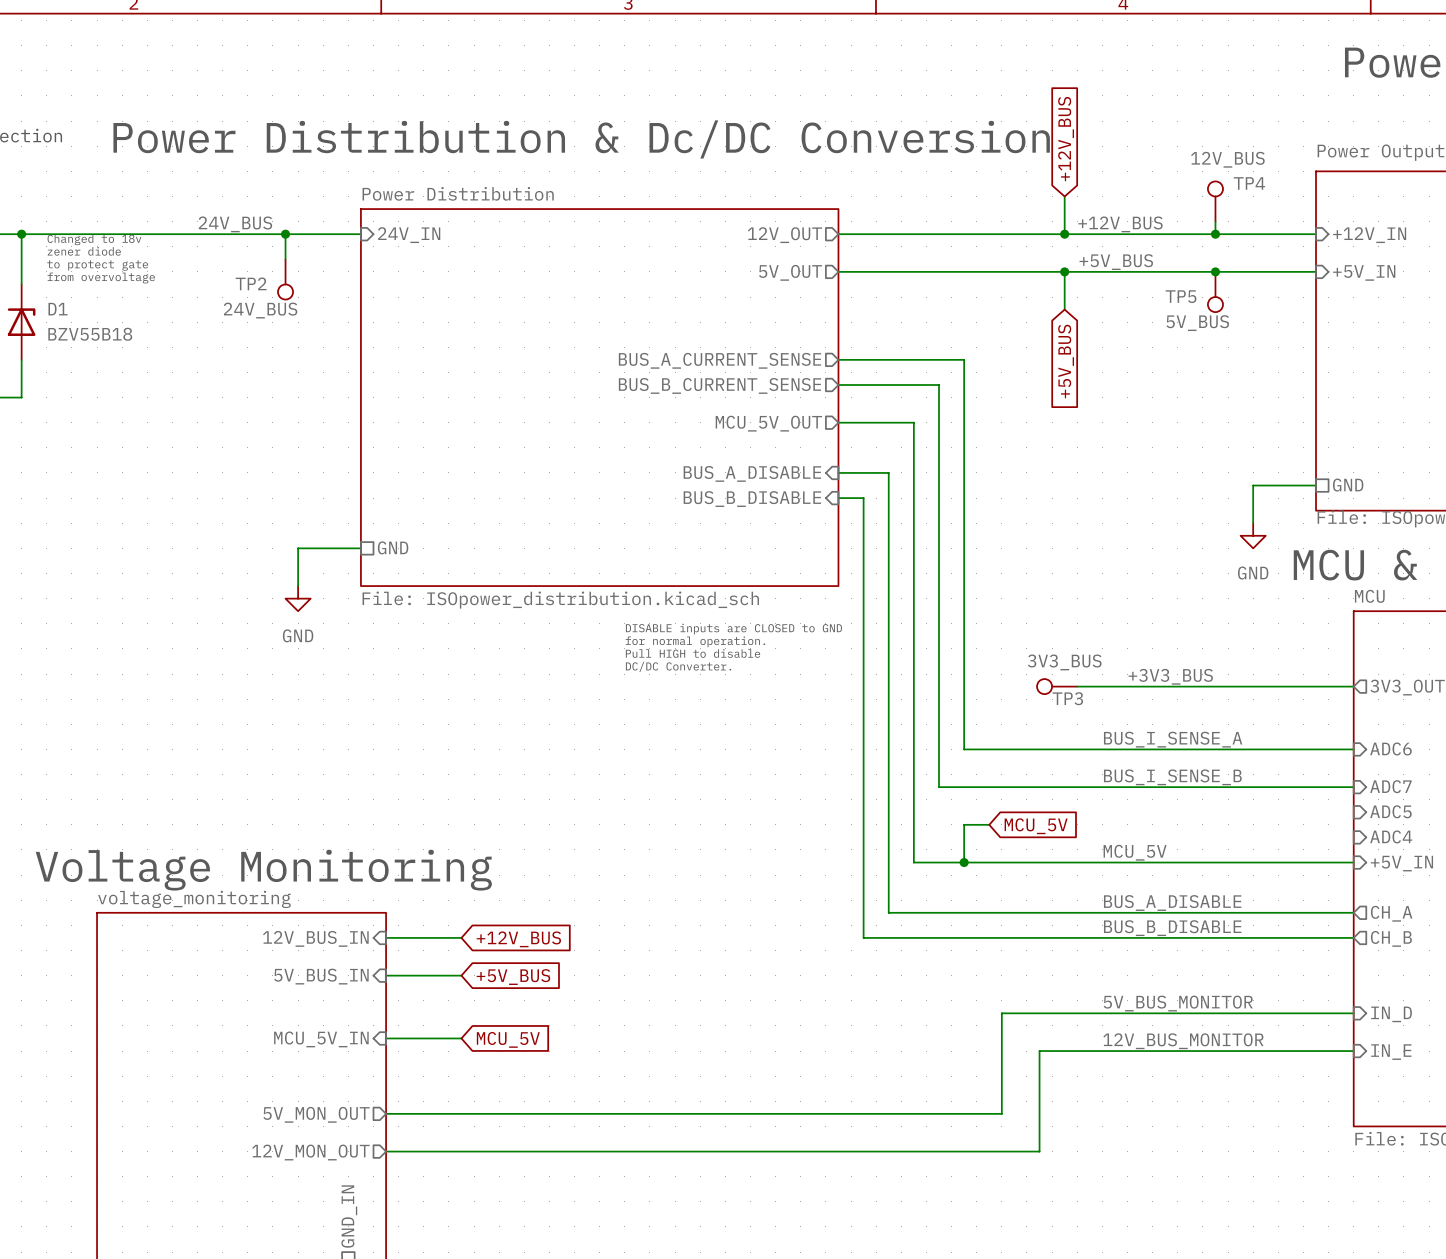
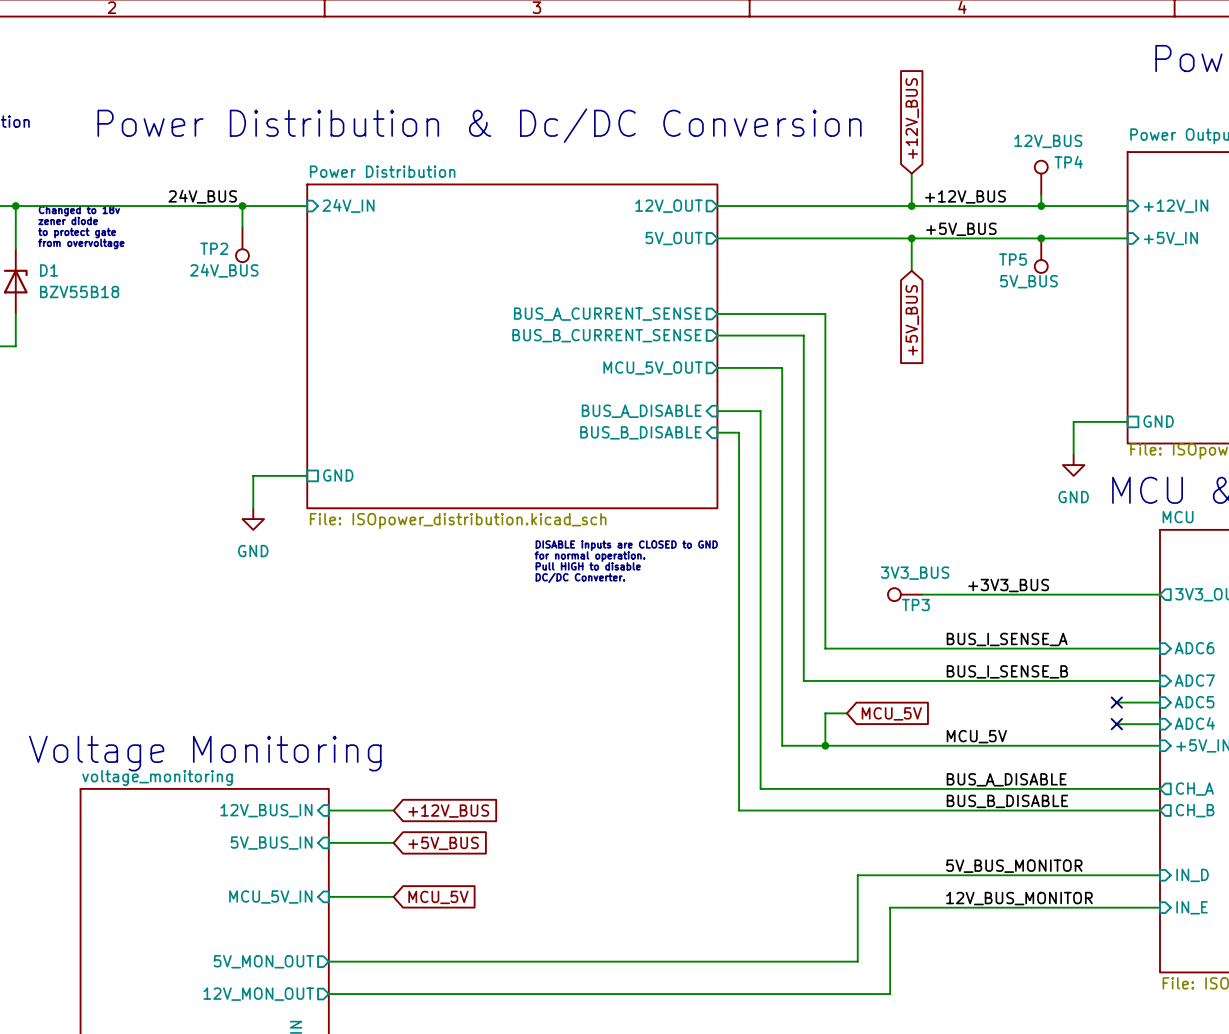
wire: none -> (1116, 702) (1159, 702)
no-connect mark: none -> (1116, 702)
wire: none -> (1116, 724) (1159, 724)
no-connect mark: none -> (1116, 724)

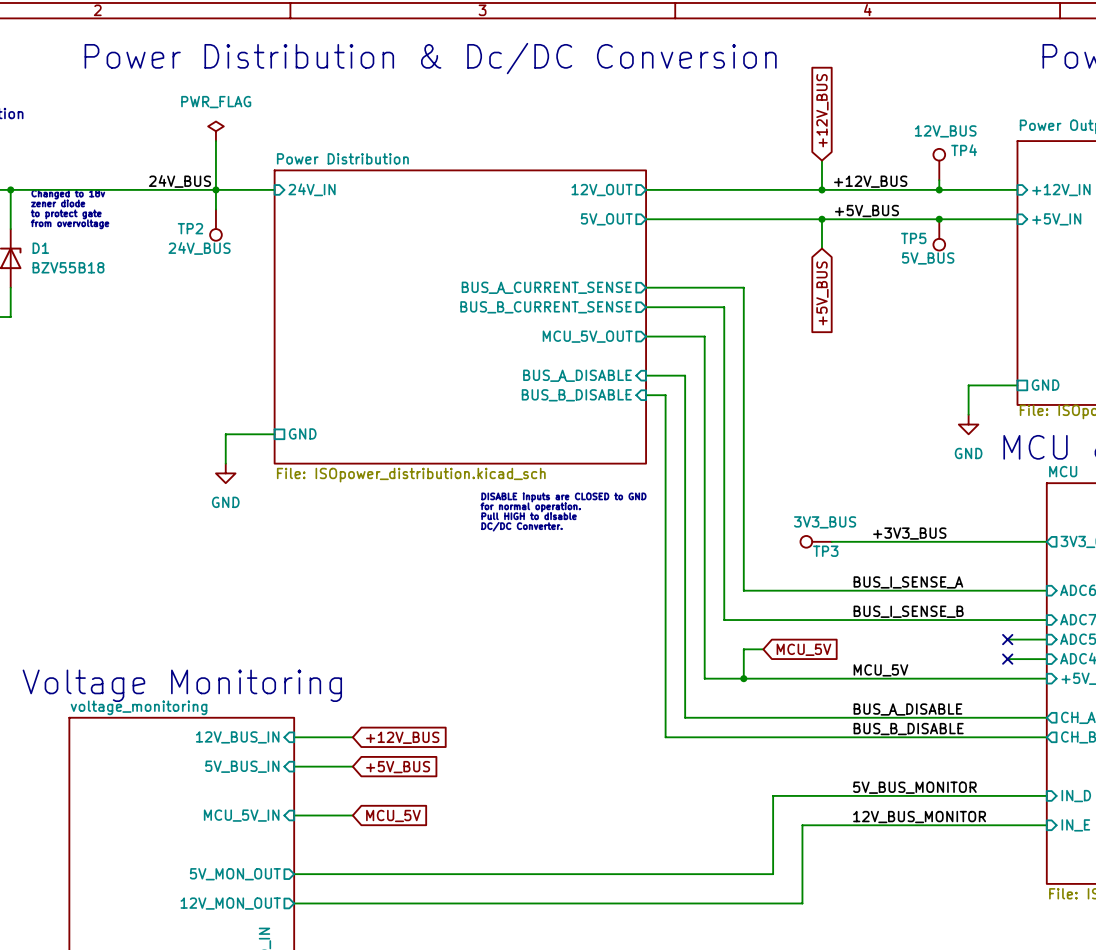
text position: Power Distribution & Dc/DC Conversion (479, 125) -> Power Distribution & Dc/DC Conversion (430, 58)
power symbol: none -> PWR_FLAG (215, 131)
wire: none -> (215, 141) (215, 189)

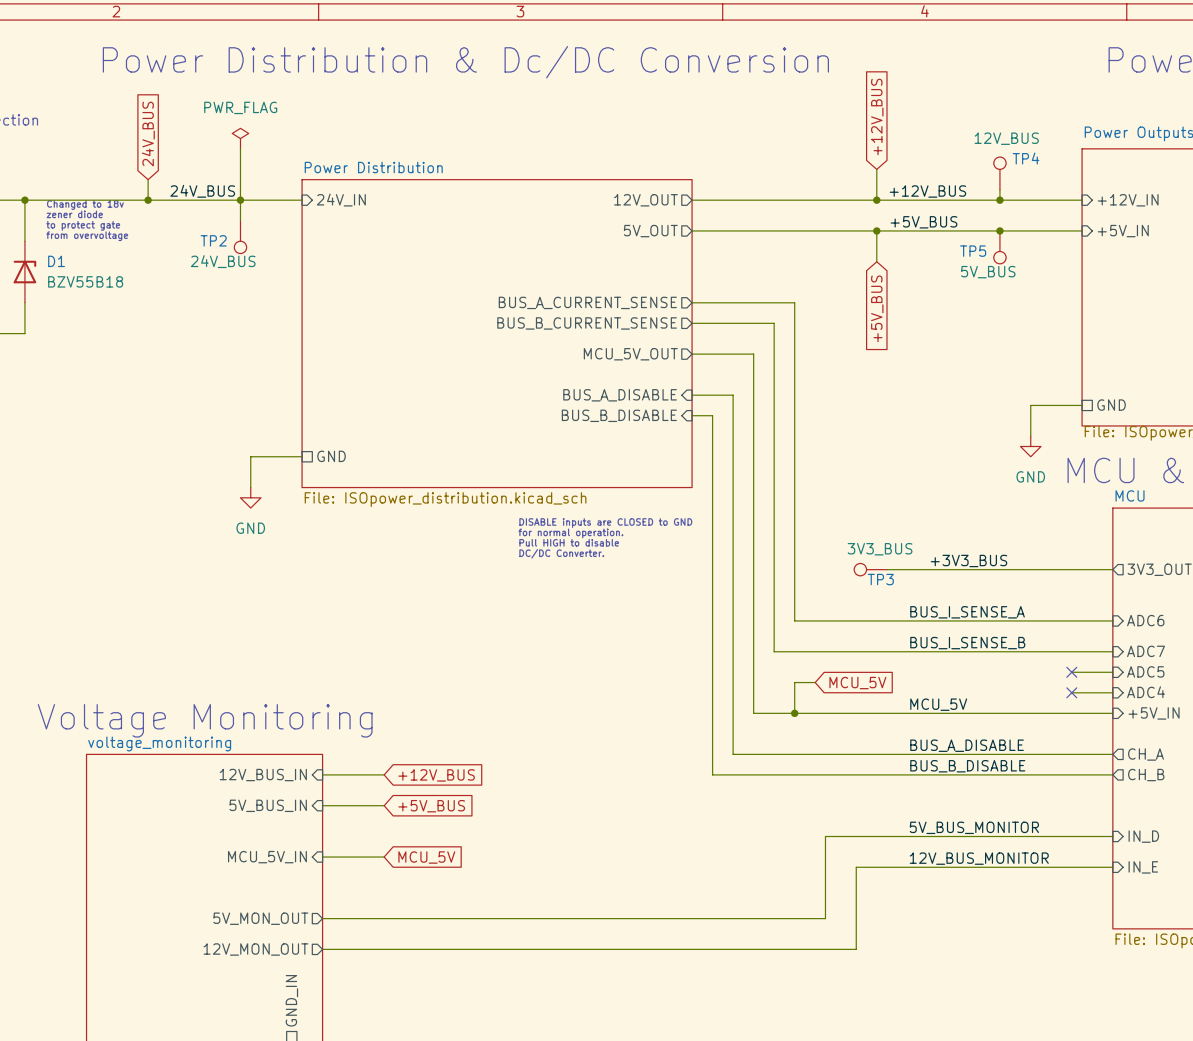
global label: none -> 24V_BUS (148, 134)
wire: none -> (148, 179) (148, 200)
junction: none -> (148, 200)

